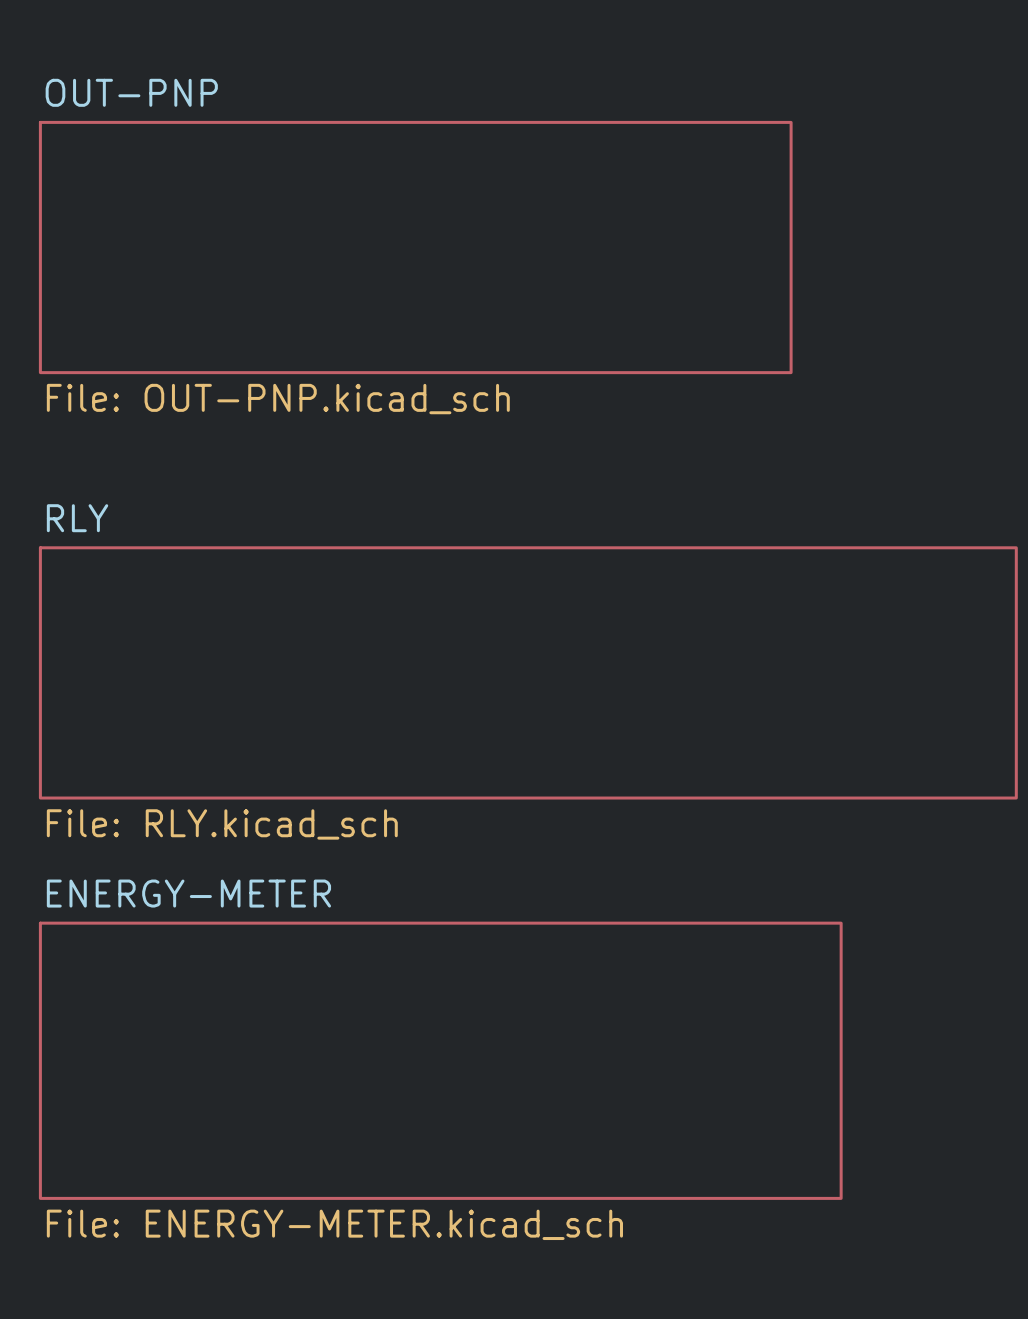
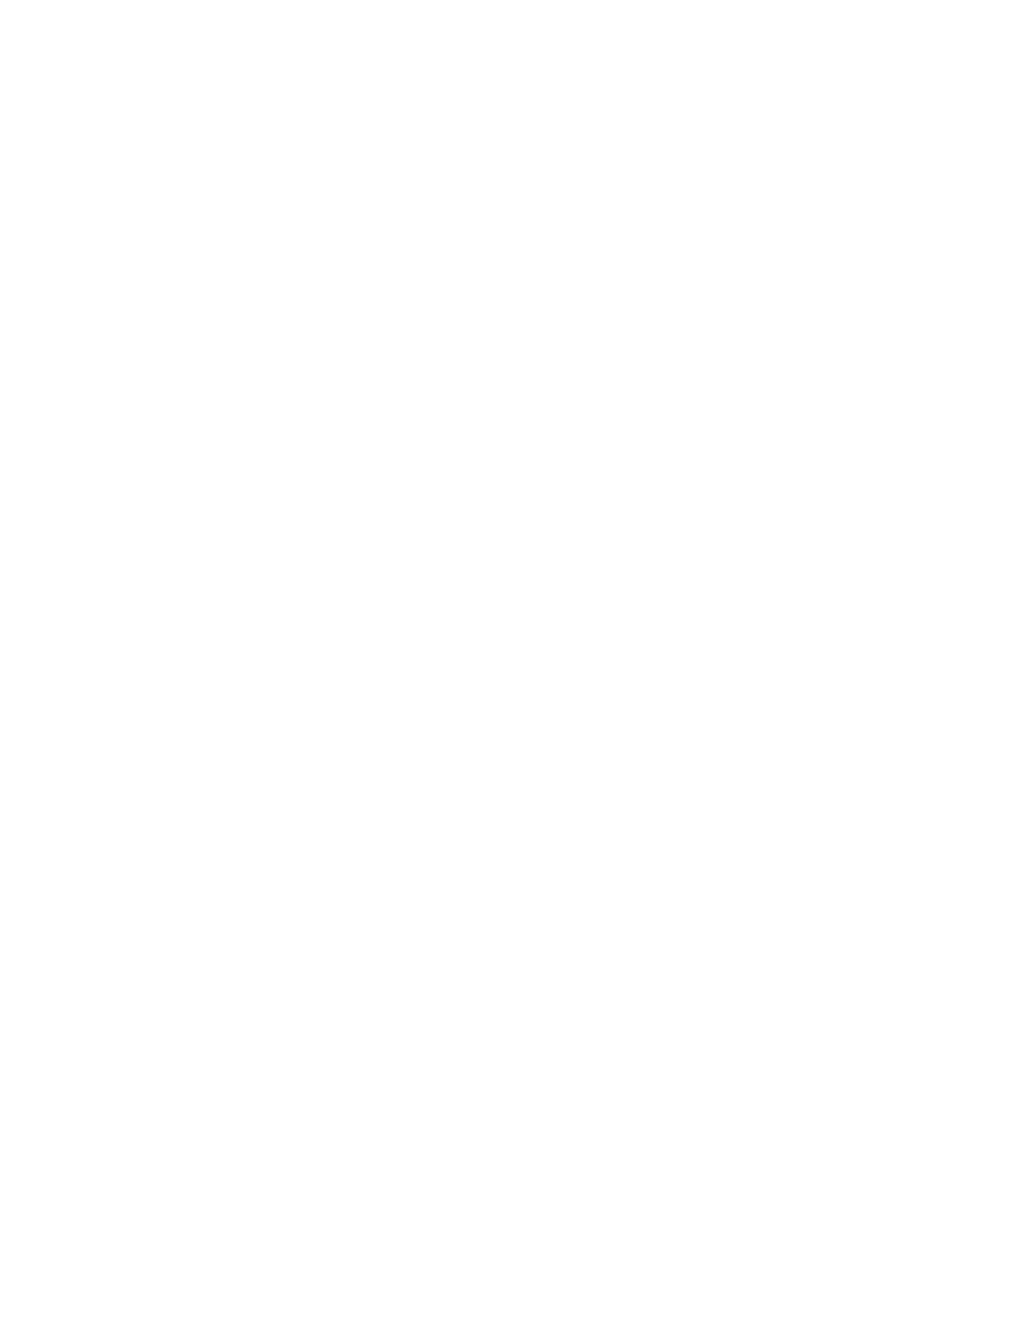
sheet OUT-PNP: File: OUT-PNP.kicad_sch (415, 247) -> none
sheet RLY: File: RLY.kicad_sch (528, 672) -> none
sheet ENERGY-METER: File: ENERGY-METER.kicad_sch (440, 1060) -> none

